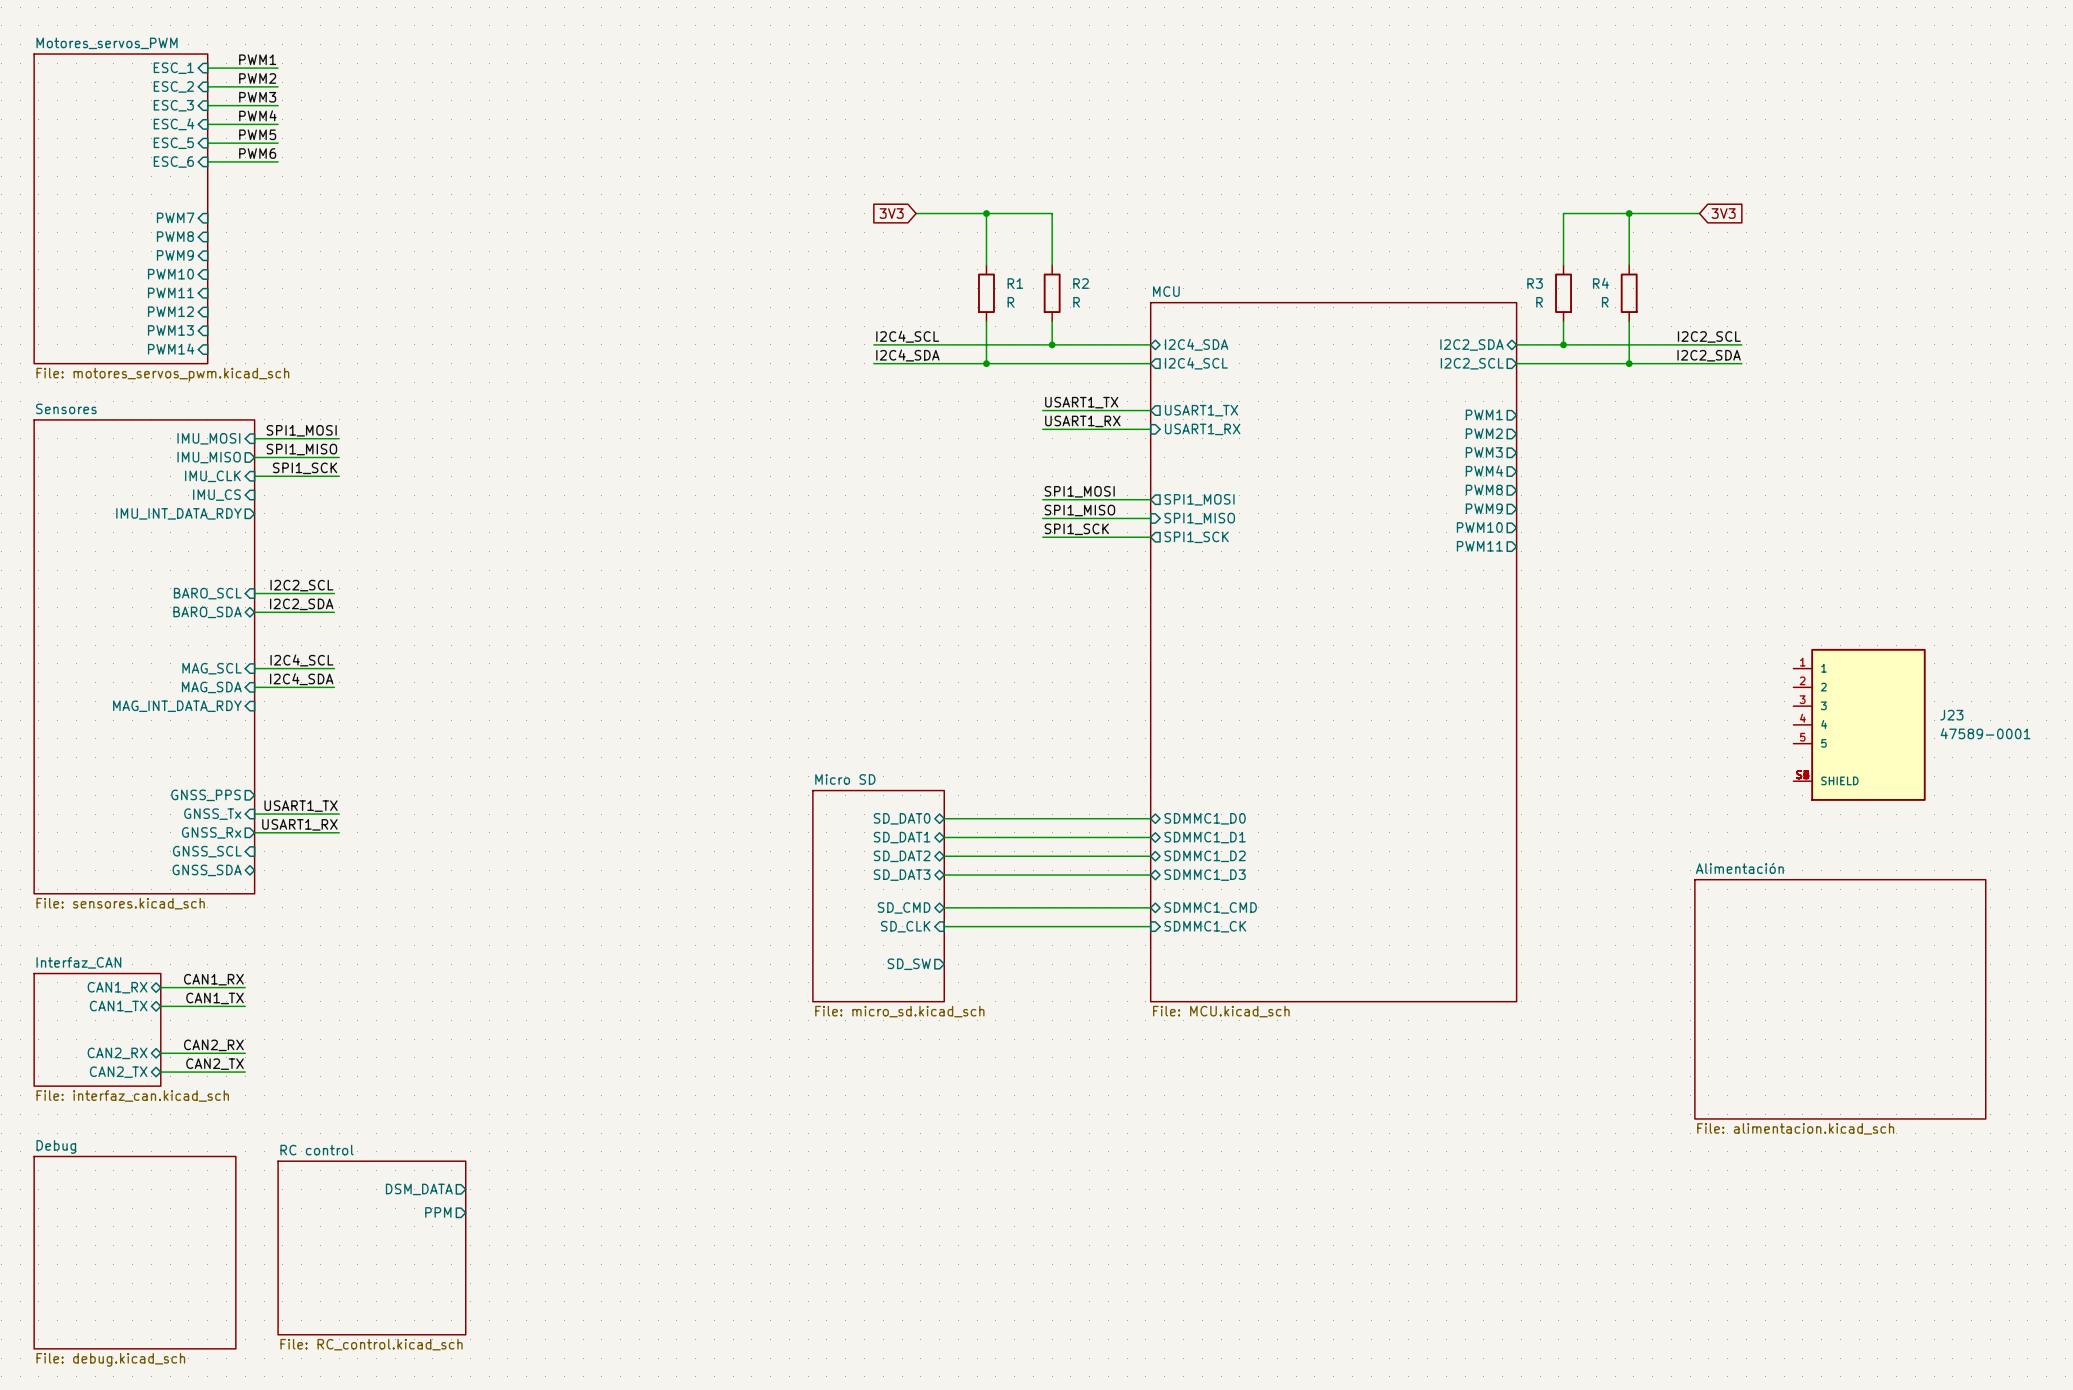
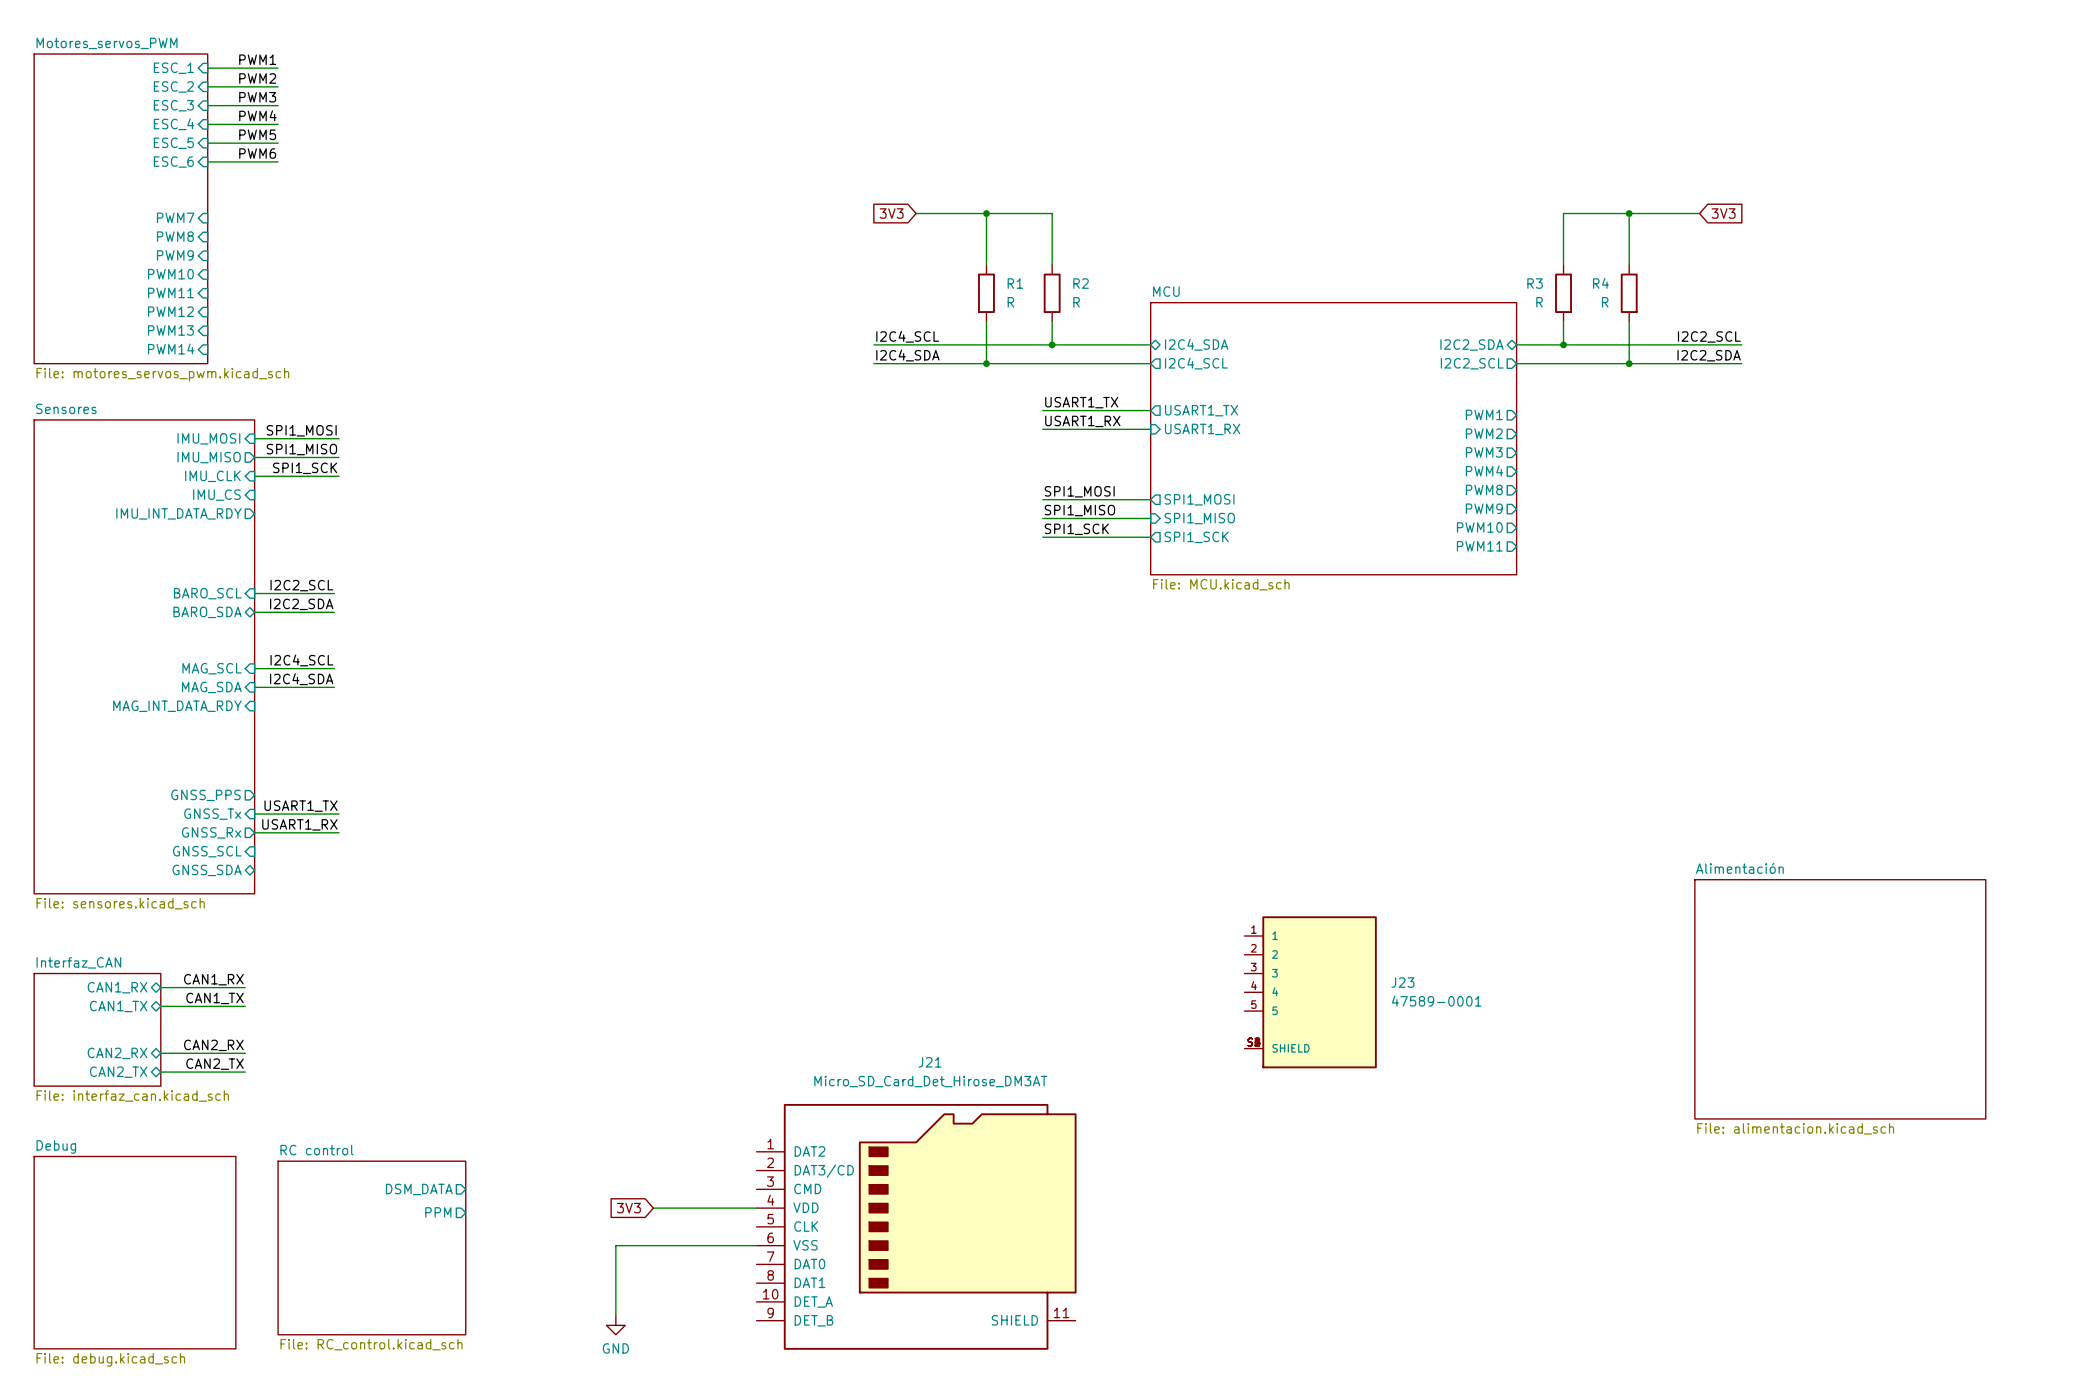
sheet MCU: none -> File: MCU.kicad_sch (1333, 438)
sheet MCU: File: MCU.kicad_sch (1333, 652) -> none
J23 position: (1859, 724) -> (1310, 992)
sheet pin: SD_DAT0 (902, 818) -> none
wire: (944, 818) (1150, 818) -> none
sheet pin: SDMMC1_D0 (1205, 818) -> none
sheet pin: SD_DAT1 (902, 837) -> none
wire: (944, 837) (1150, 837) -> none
sheet pin: SDMMC1_D1 (1205, 837) -> none
sheet pin: SD_DAT2 (902, 856) -> none
wire: (944, 856) (1150, 856) -> none
sheet pin: SDMMC1_D2 (1205, 856) -> none
sheet pin: SD_DAT3 (902, 875) -> none
wire: (944, 875) (1150, 875) -> none
sheet pin: SDMMC1_D3 (1205, 875) -> none
sheet Micro SD: File: micro_sd.kicad_sch (878, 896) -> none
sheet pin: SD_CMD (904, 907) -> none
wire: (944, 907) (1150, 907) -> none
sheet pin: SDMMC1_CMD (1210, 907) -> none
sheet pin: SD_CLK (905, 926) -> none
wire: (944, 926) (1150, 926) -> none
sheet pin: SDMMC1_CK (1205, 926) -> none
sheet pin: SD_SW (909, 964) -> none
global label: none -> 3V3 (628, 1208)
wire: none -> (653, 1208) (756, 1208)
J21: none -> Micro_SD_Card_Det_Hirose_DM3AT (916, 1226)
wire: none -> (756, 1245) (615, 1245) (615, 1316)
power symbol: none -> GND (615, 1325)

